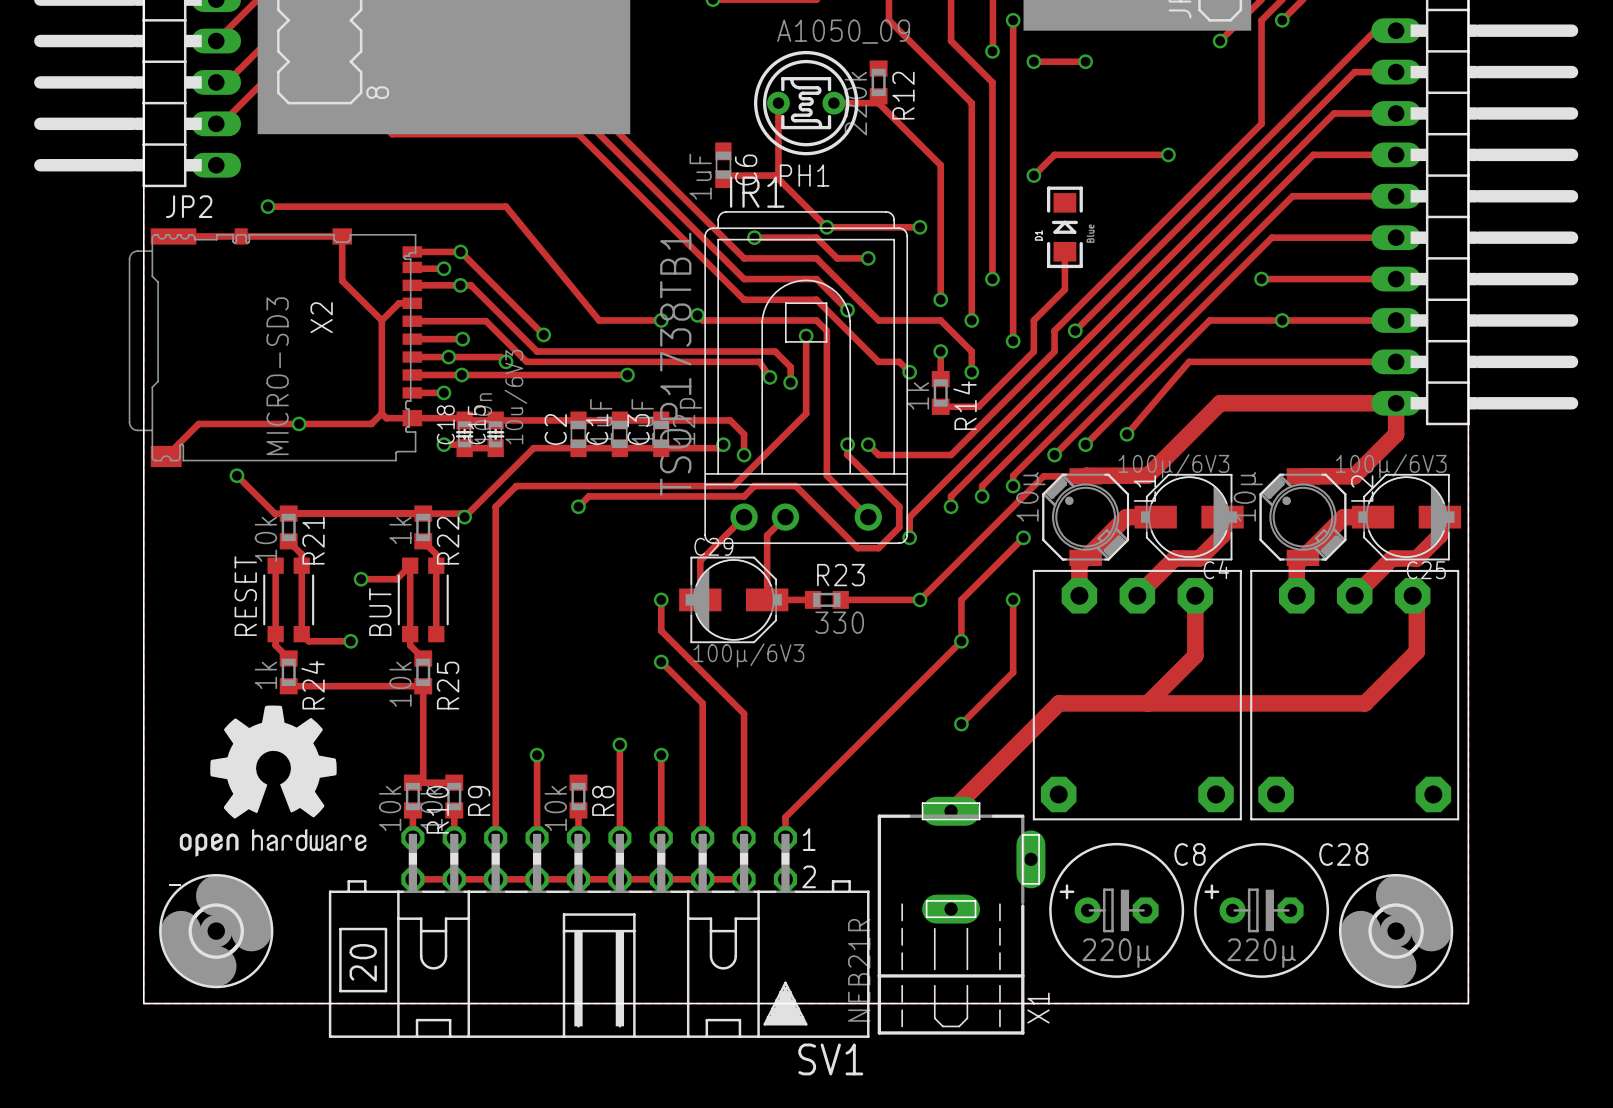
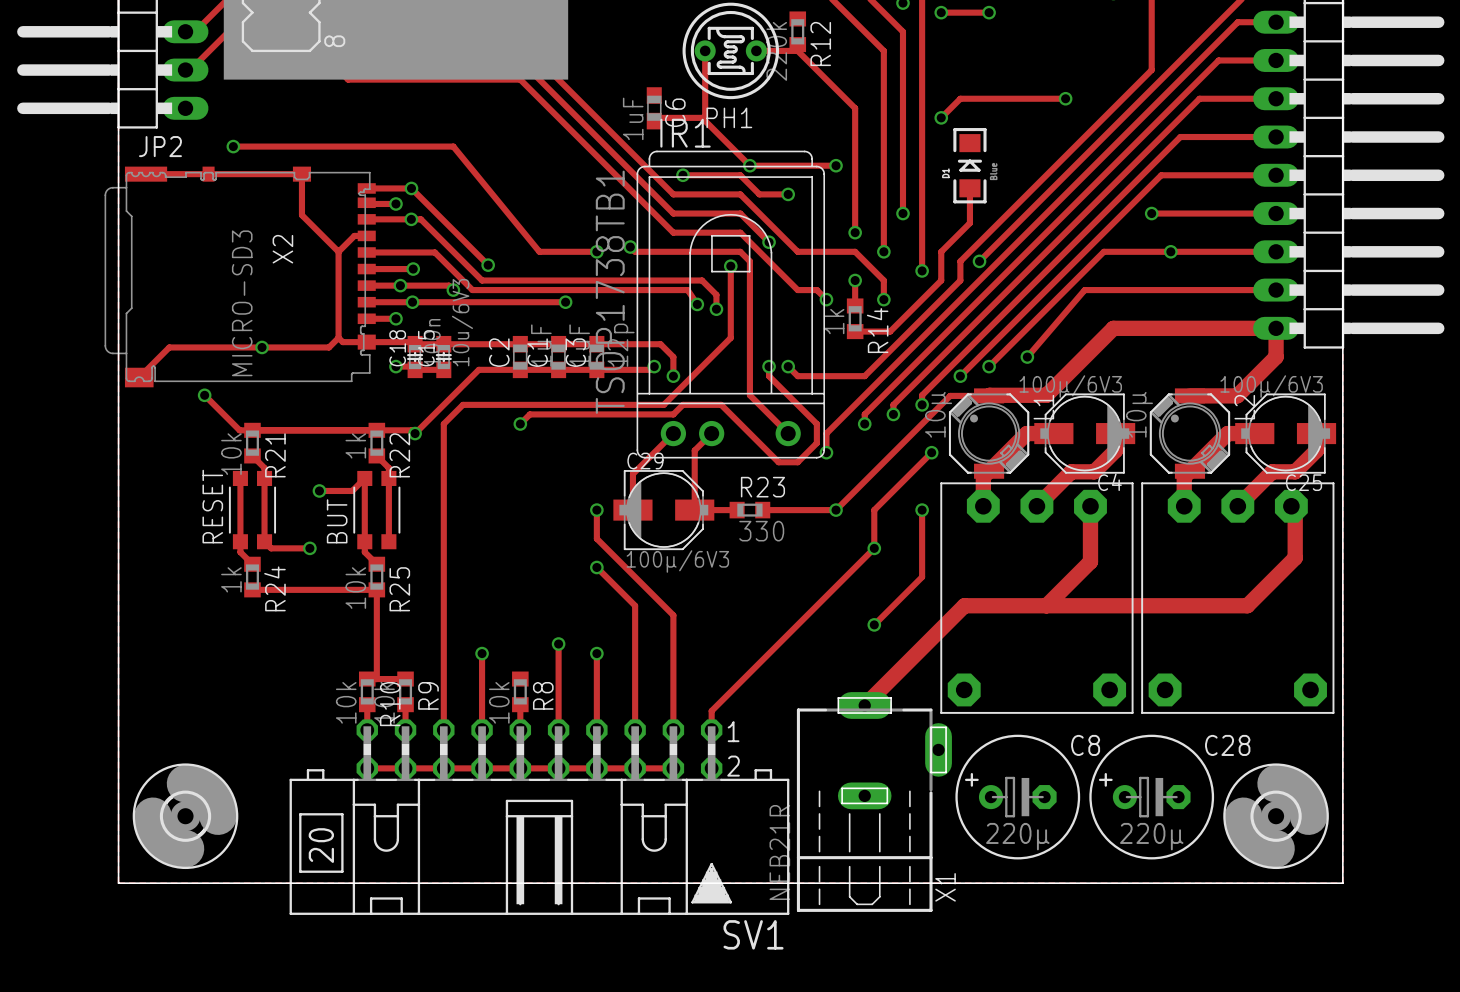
drawing: [179, 705, 367, 857] -> none

